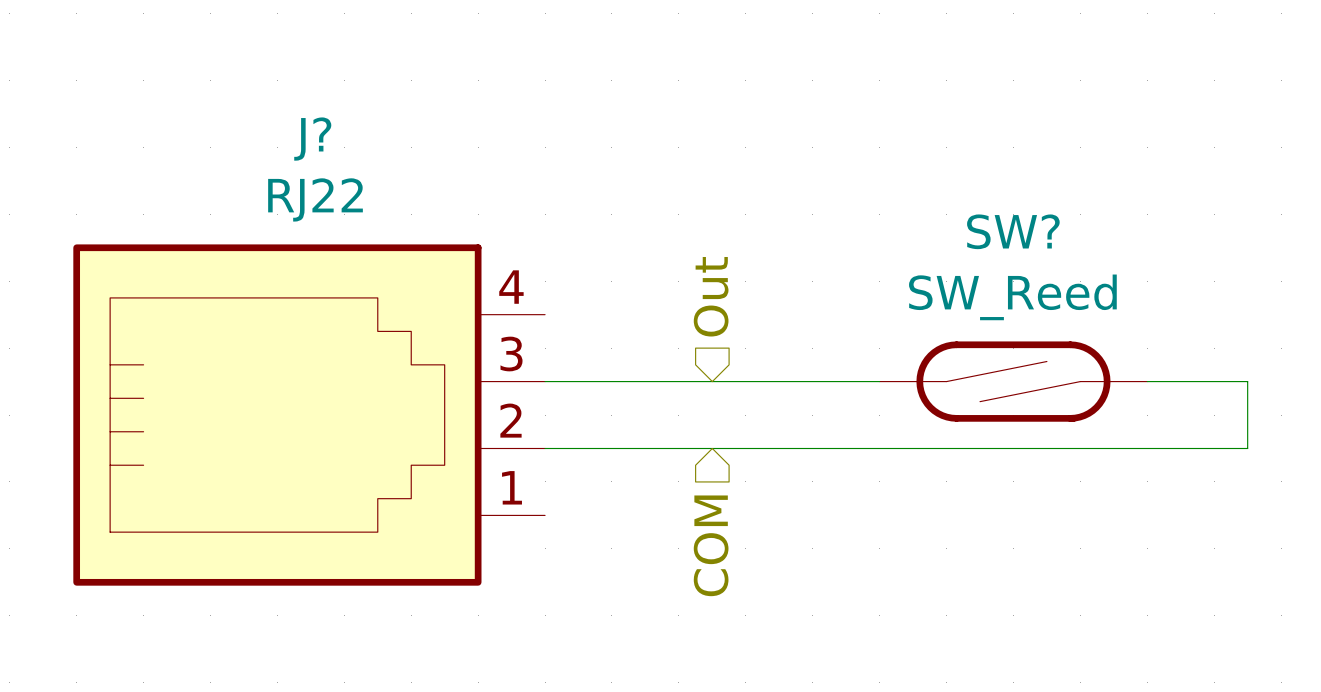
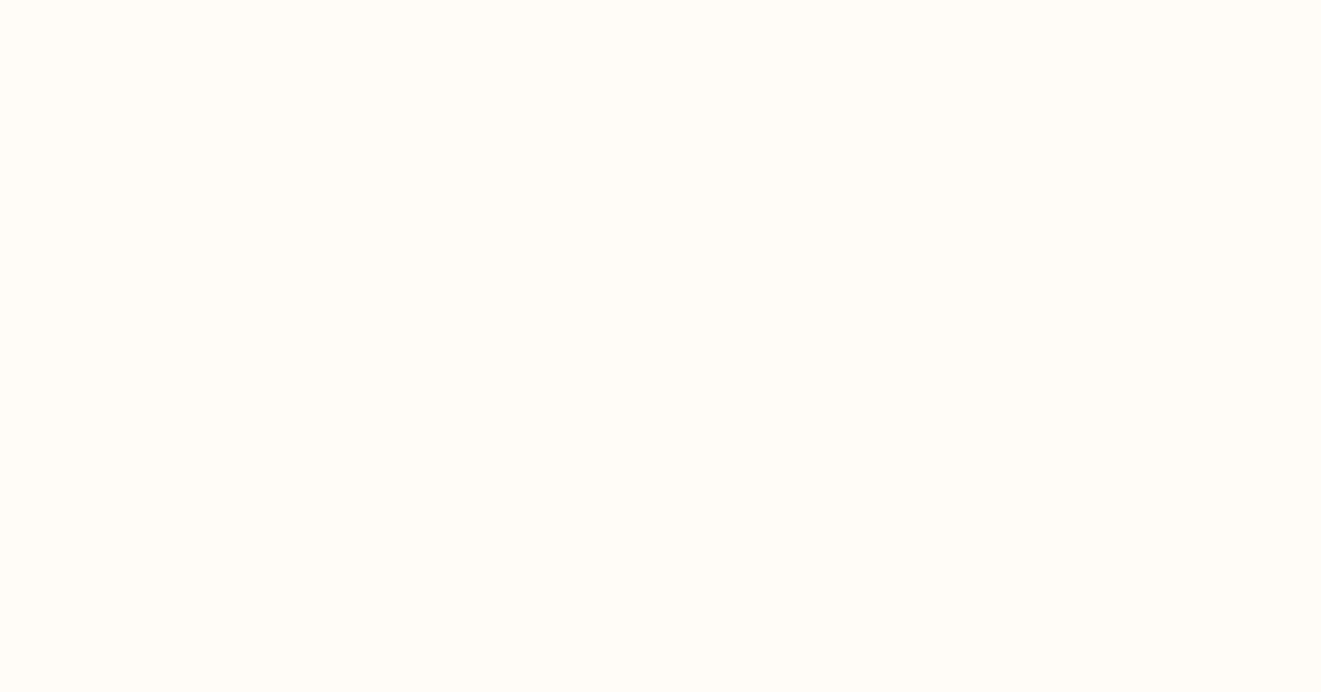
hierarchical label: Out (711, 296) -> none
wire: (545, 381) (879, 381) -> none
SW?: SW_Reed (1013, 381) -> none
wire: (1147, 381) (1247, 381) (1247, 448) (545, 448) -> none
J?: RJ22 (309, 415) -> none
hierarchical label: COM (711, 545) -> none

